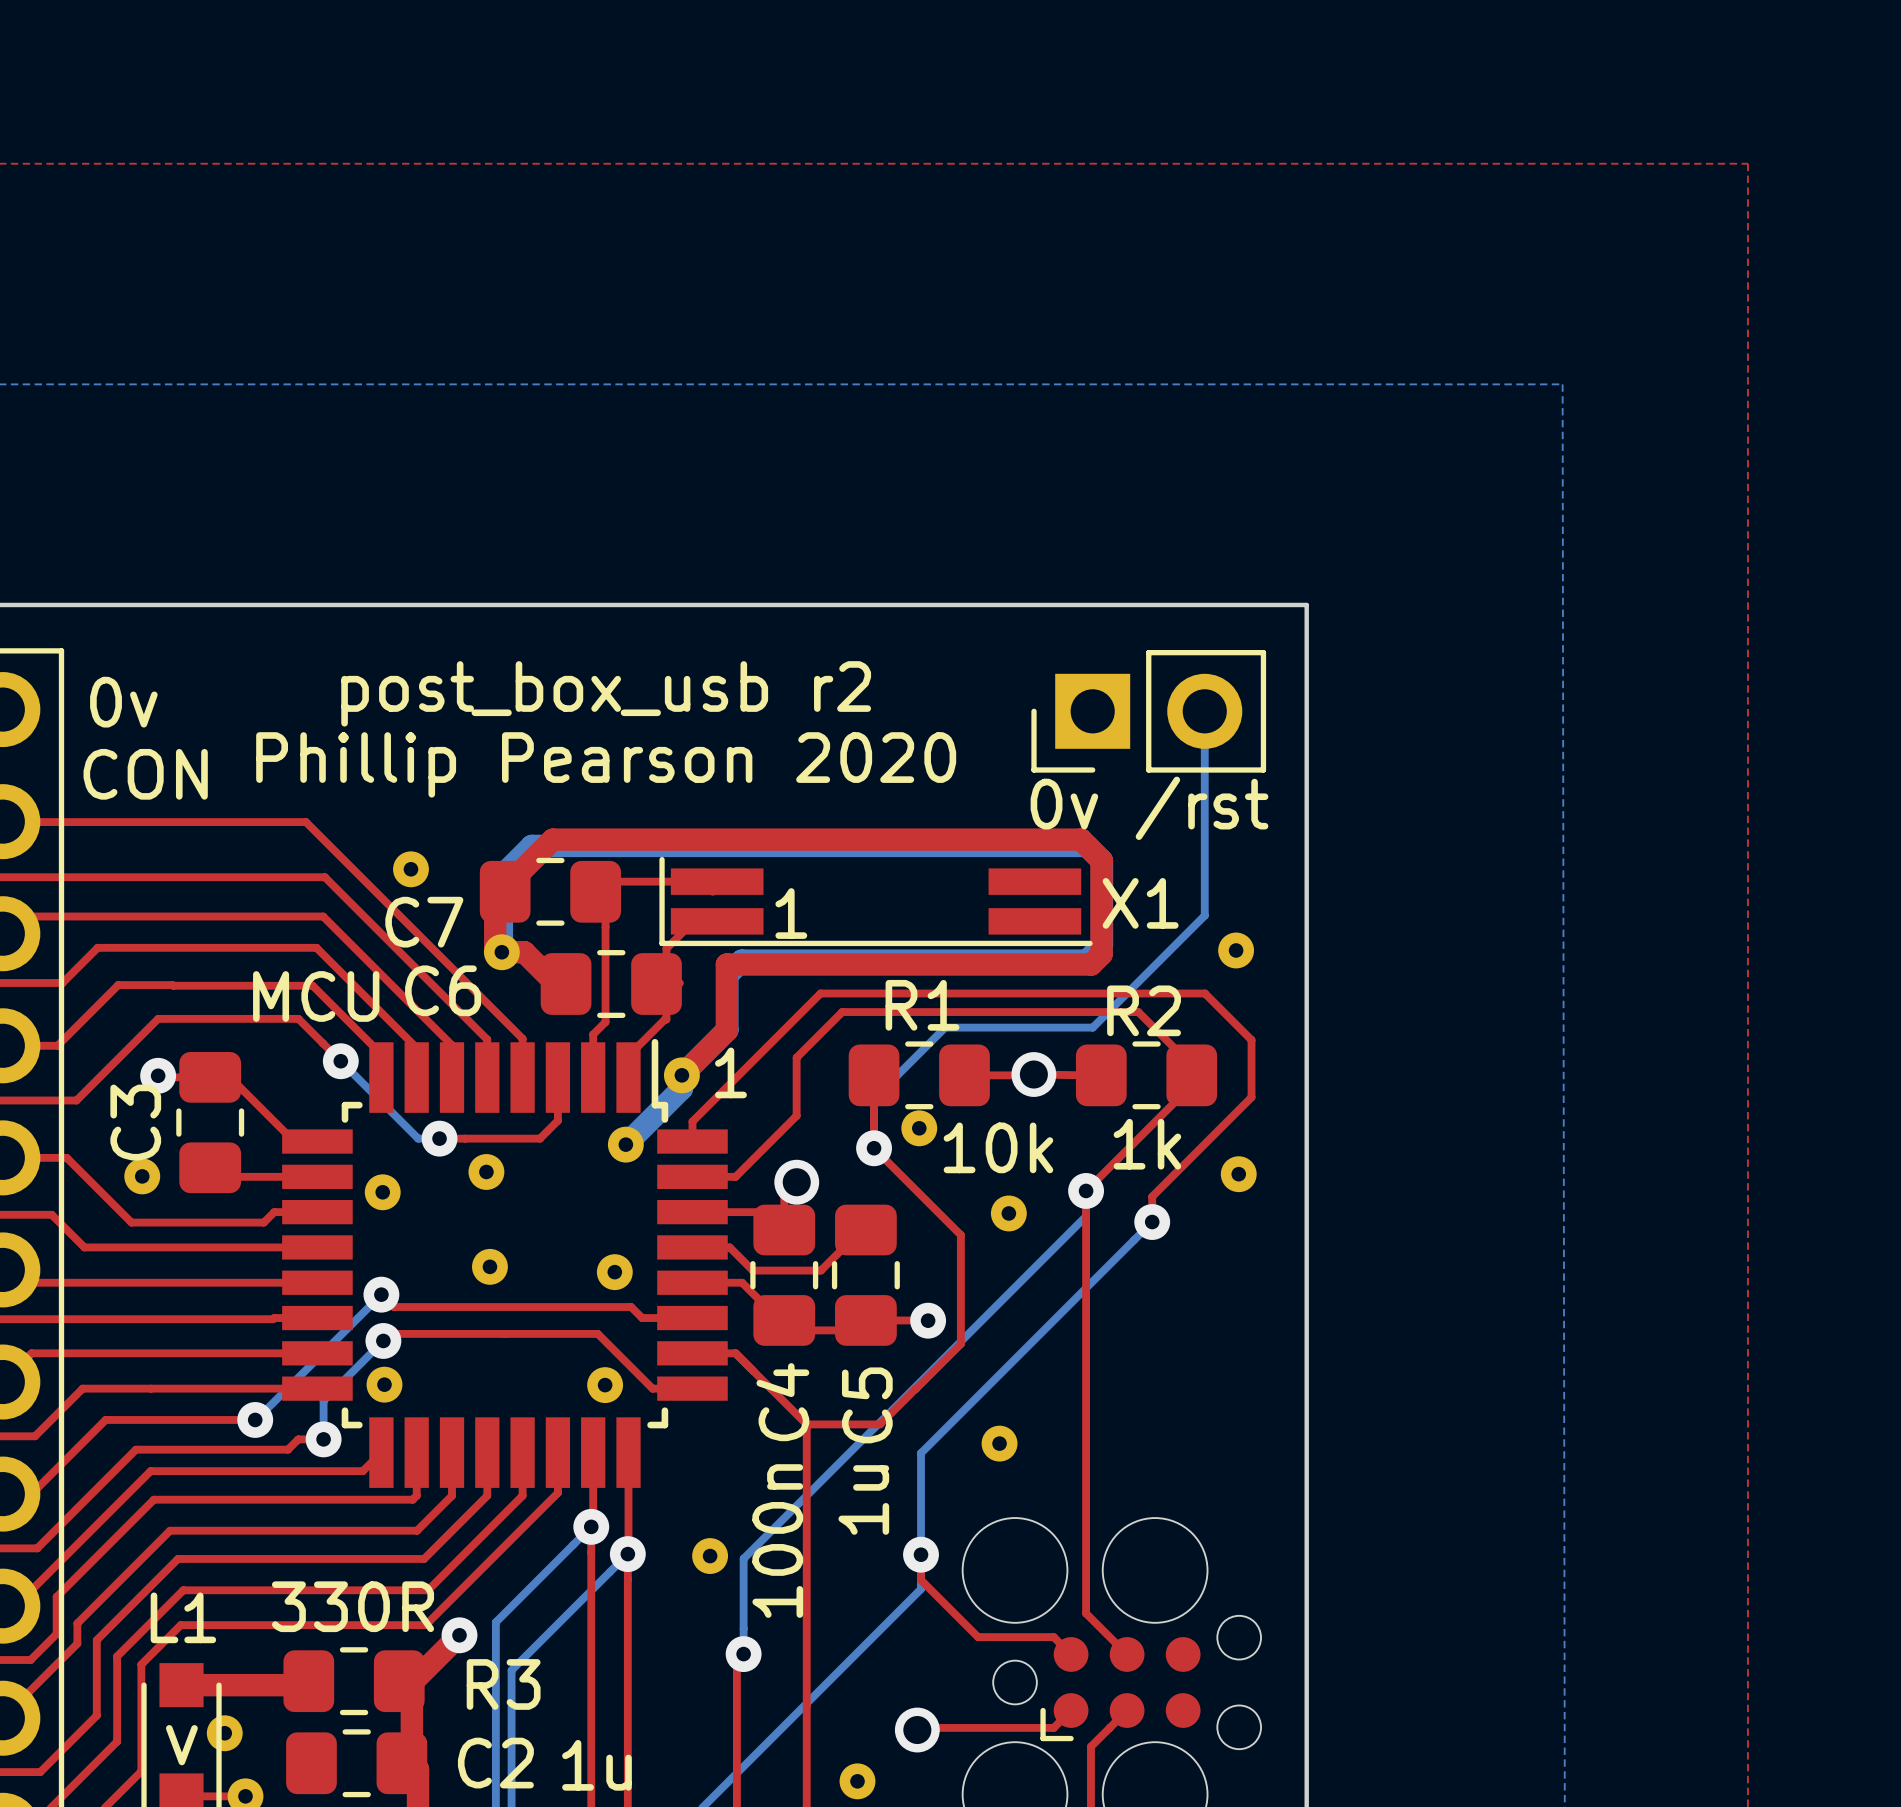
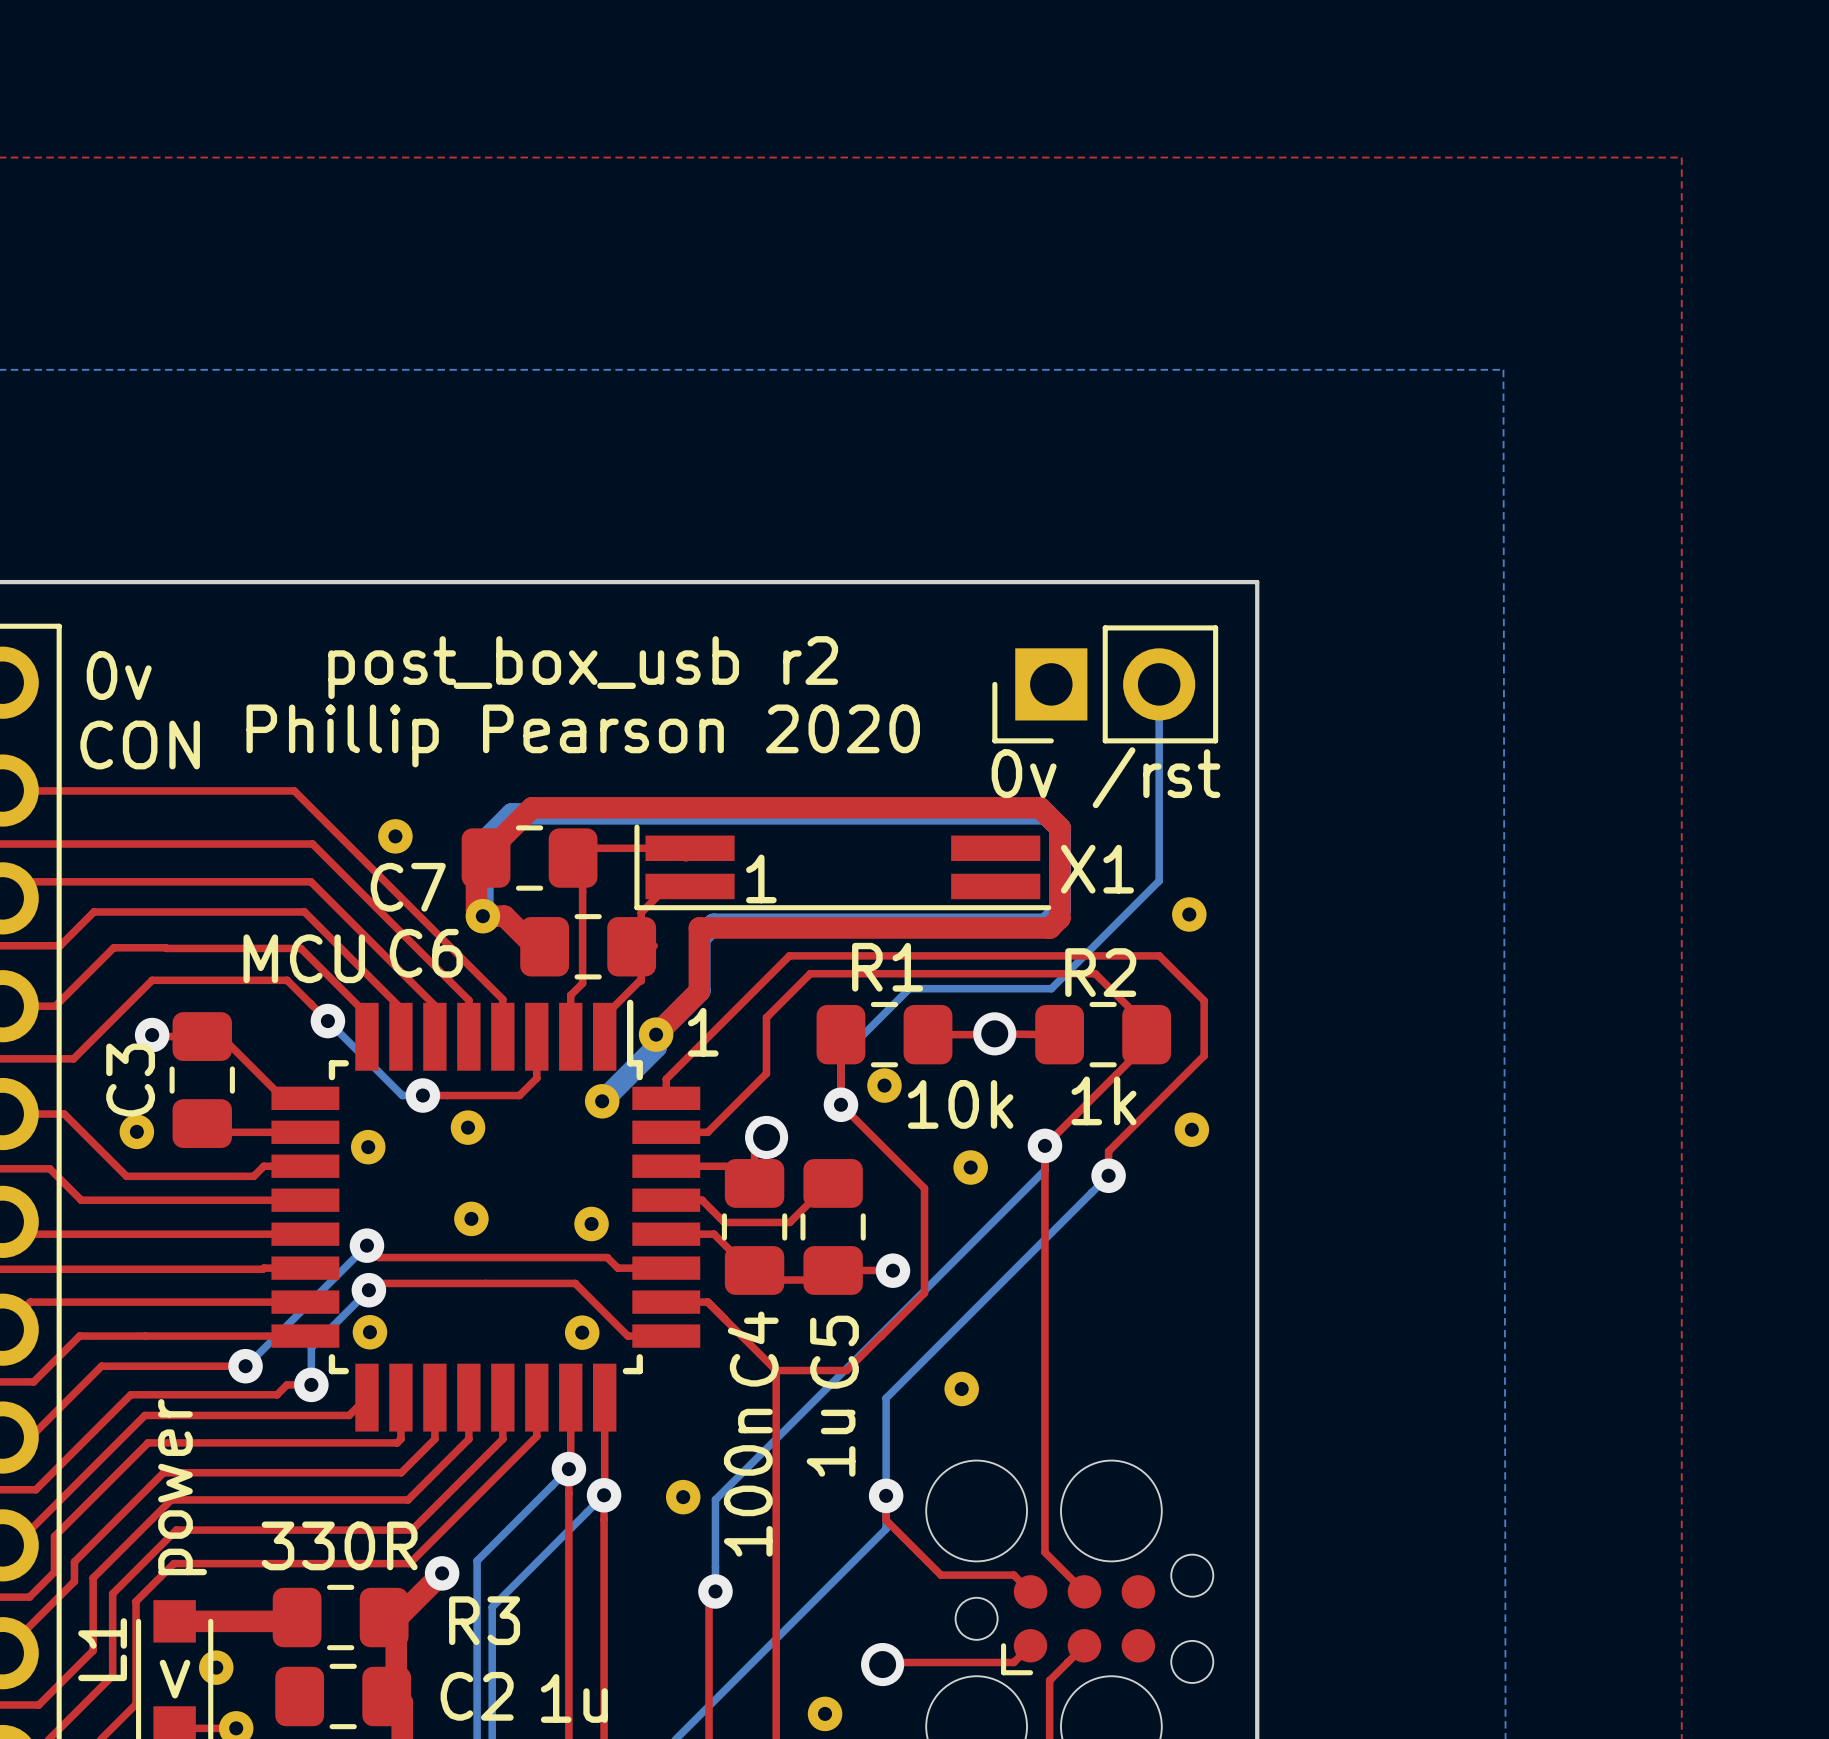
L1 value: none -> power (182, 1487)
L1 name rotation: 0° (183, 1617) -> 90° counterclockwise (102, 1649)
L1 name position: L1 (183, 1617) -> L1 (102, 1649)

